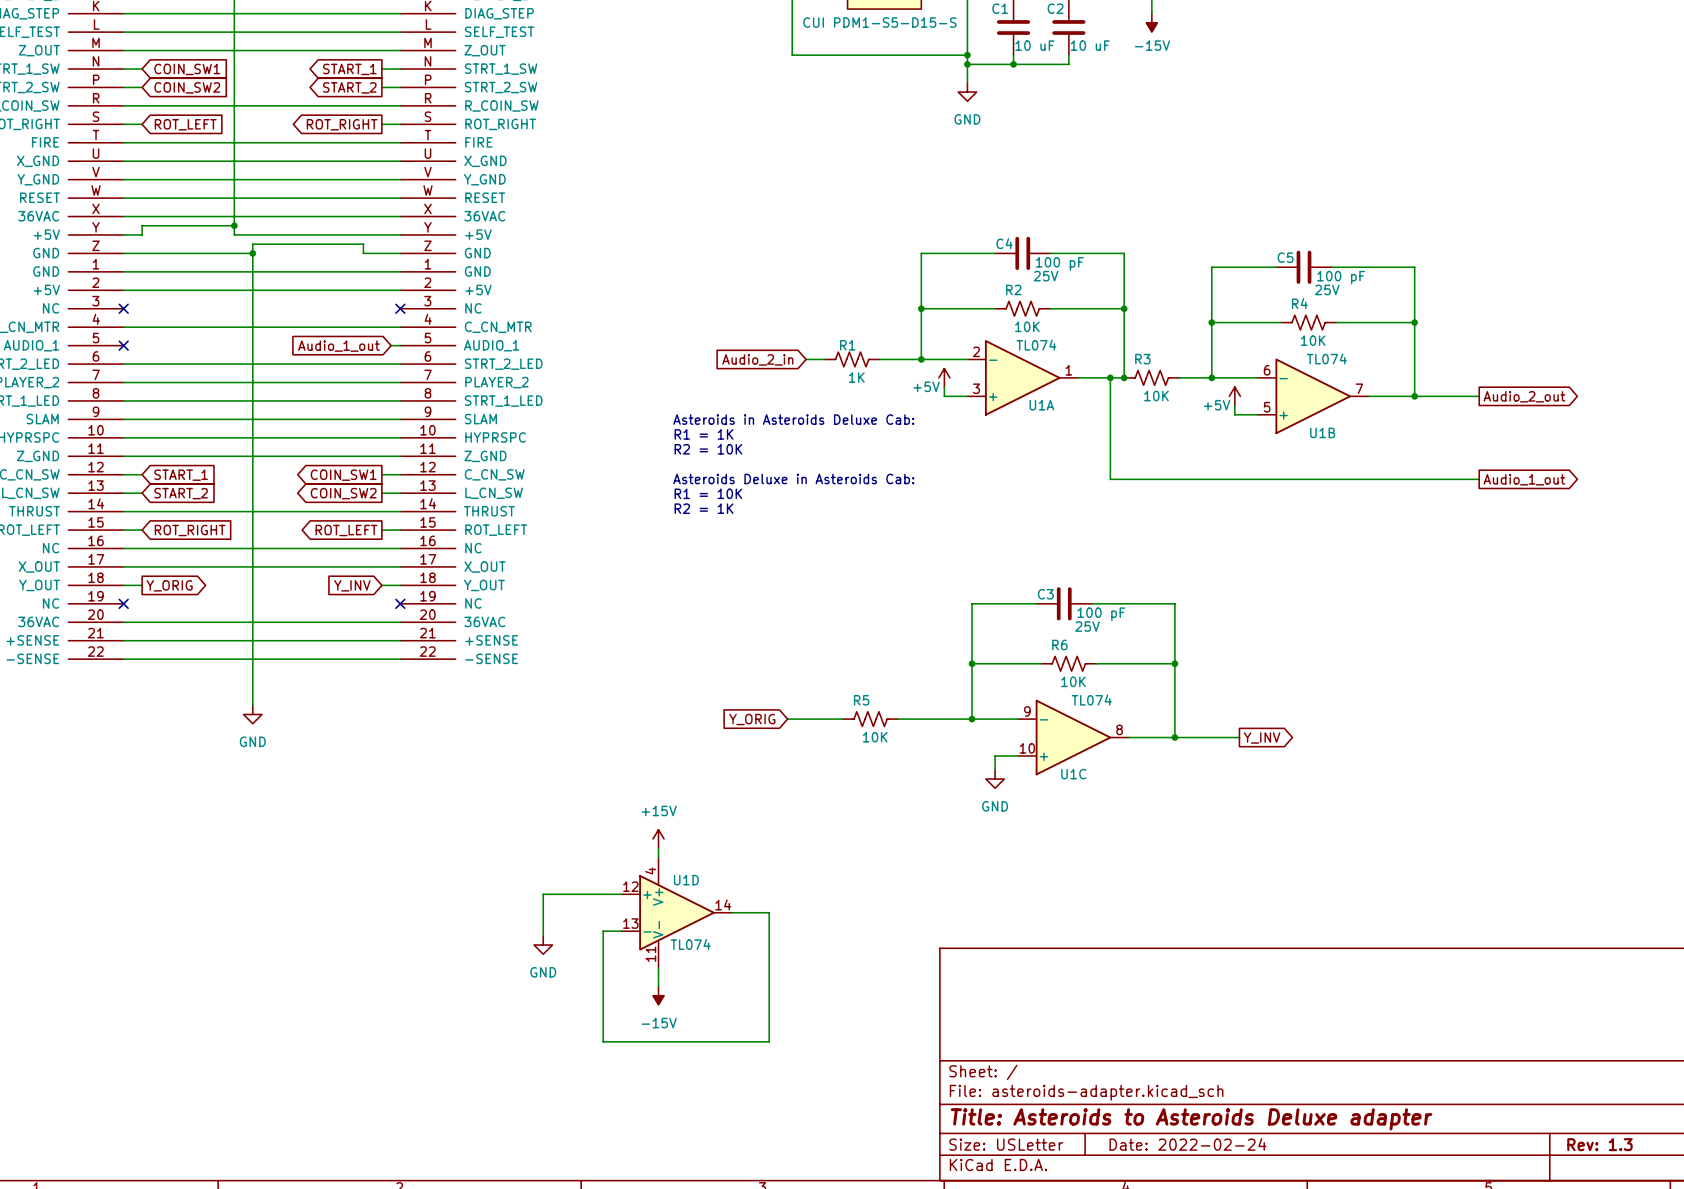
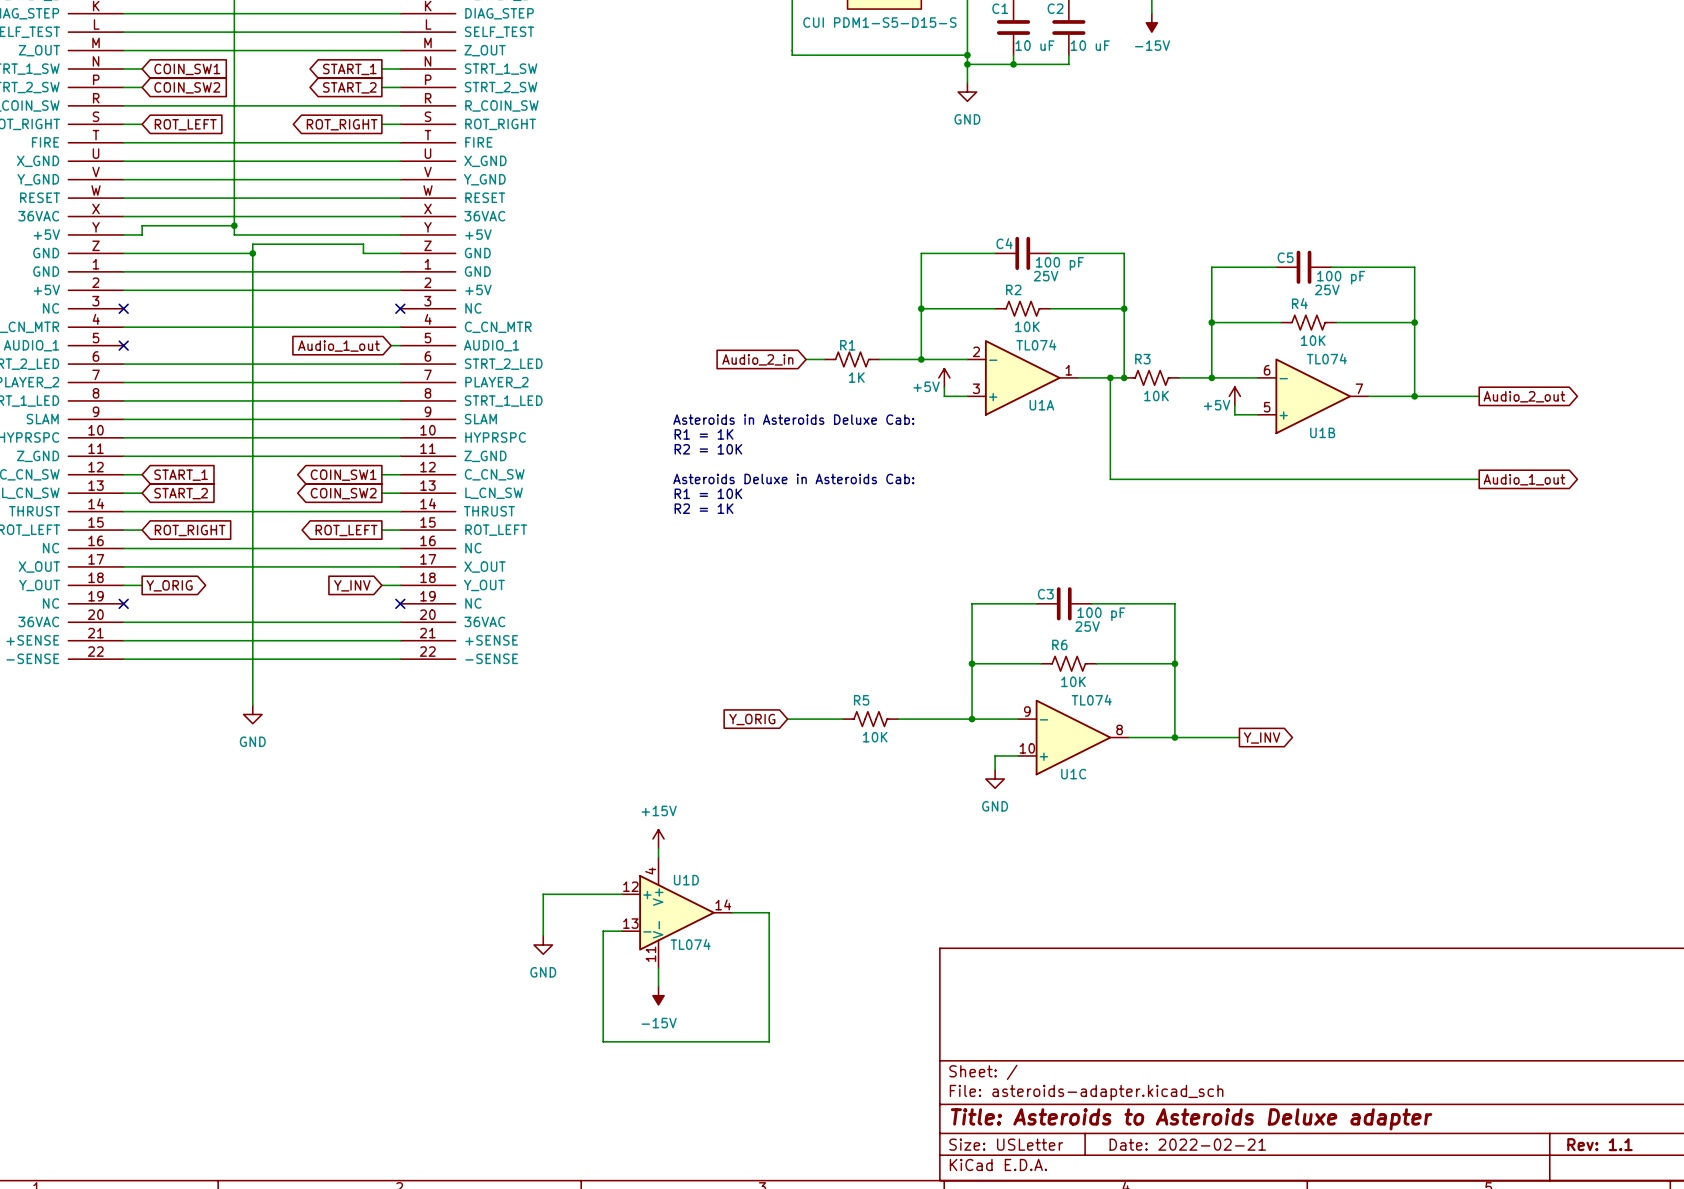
title block: Date: 2022-02-24 (1187, 1144) -> Date: 2022-02-21 (1187, 1144)
title block: Rev: 1.3 (1599, 1144) -> Rev: 1.1 (1599, 1144)

